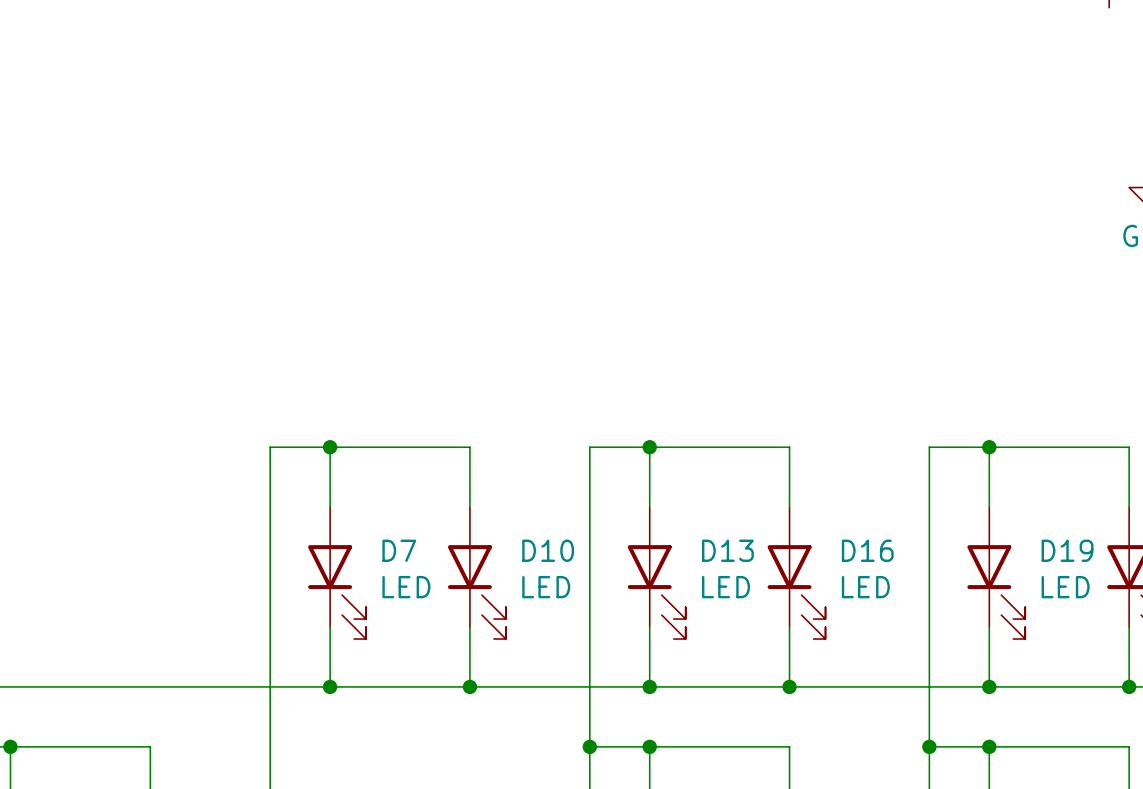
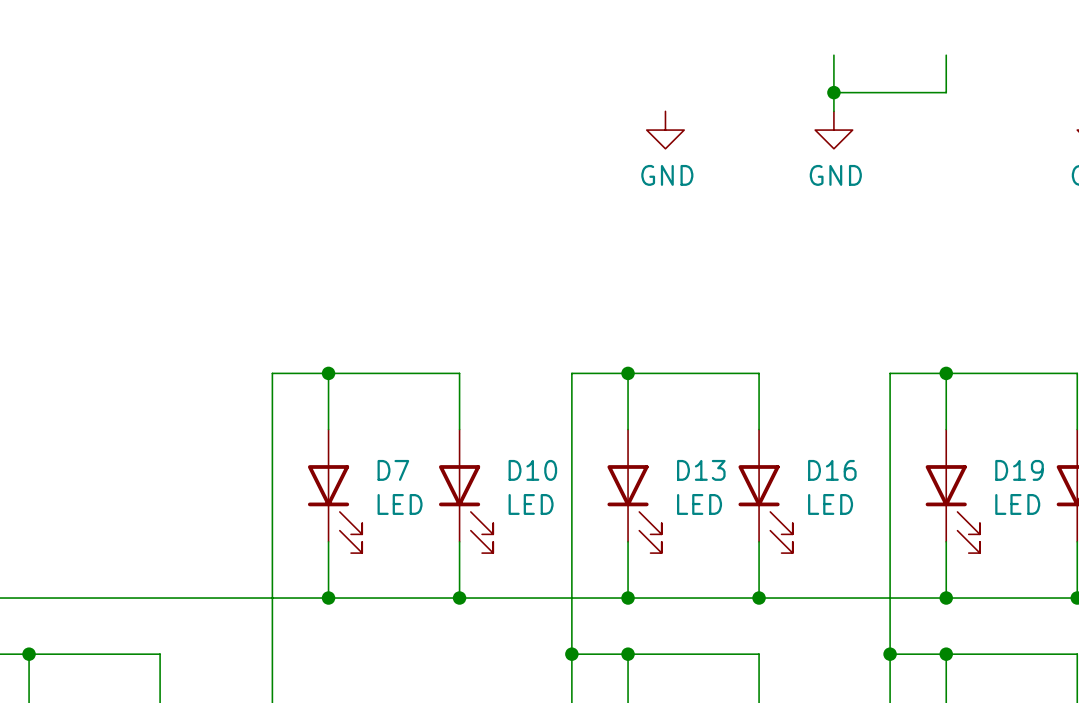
wire: none -> (833, 55) (833, 111)
wire: none -> (946, 55) (946, 92) (833, 92)
junction: none -> (833, 92)
power symbol: none -> GND (665, 130)
power symbol: none -> GND (833, 130)

